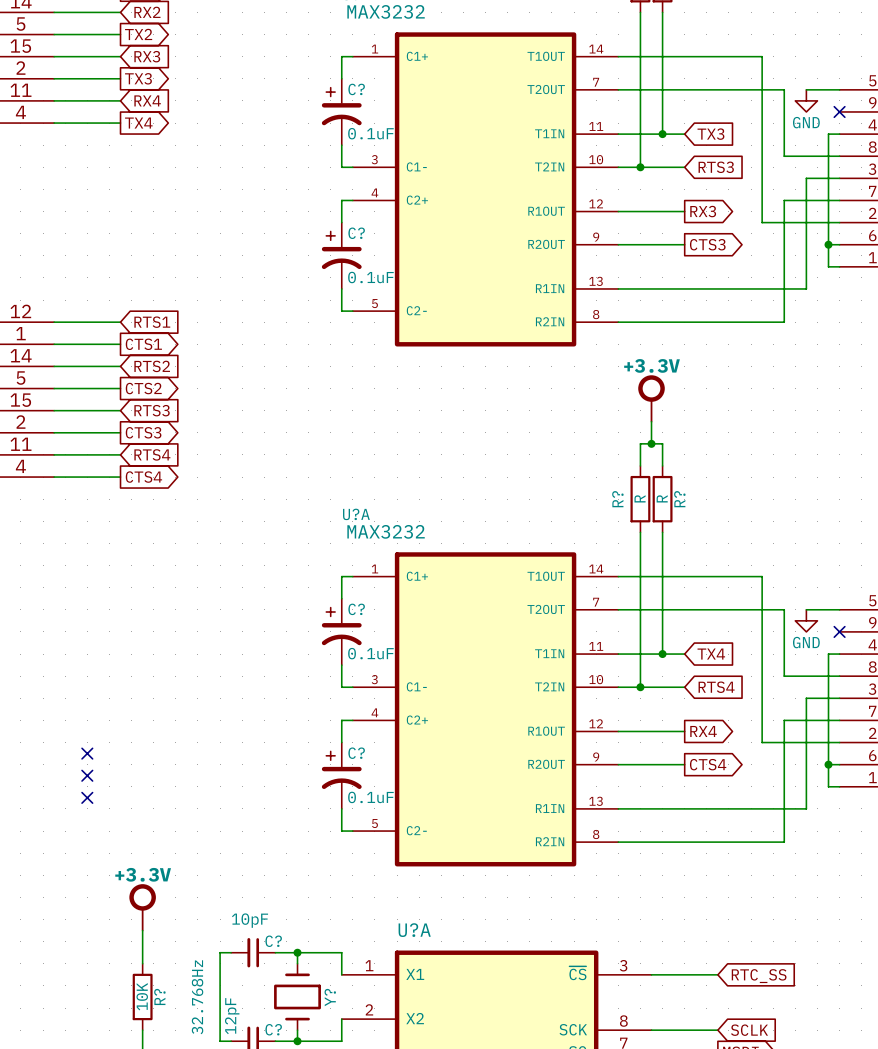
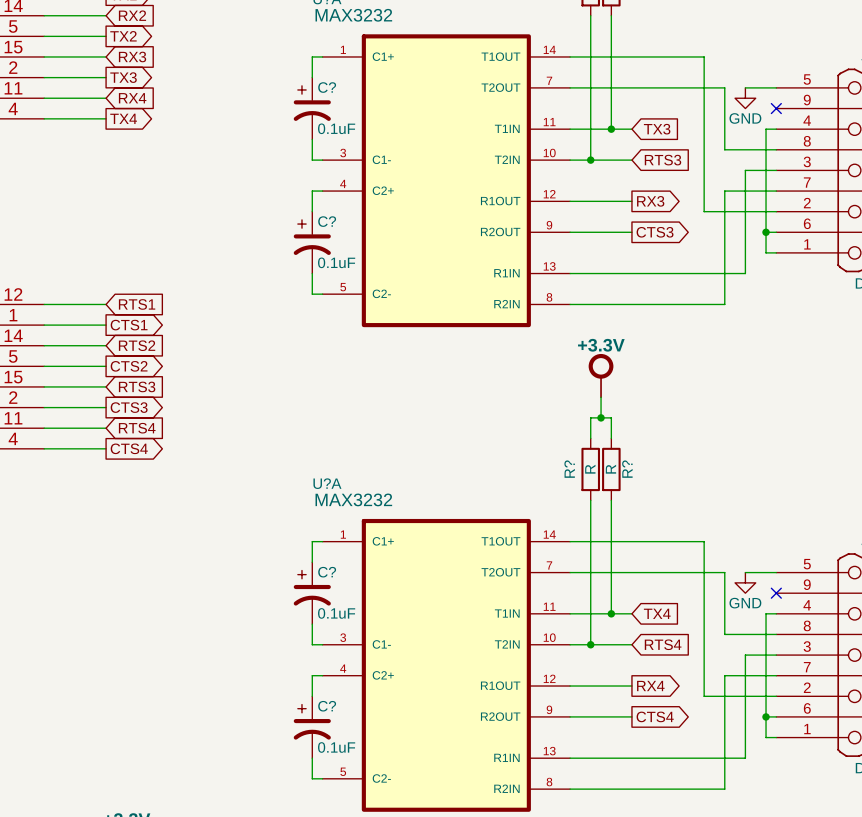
no-connect mark: (87, 753) -> none
no-connect mark: (87, 775) -> none
no-connect mark: (87, 797) -> none

